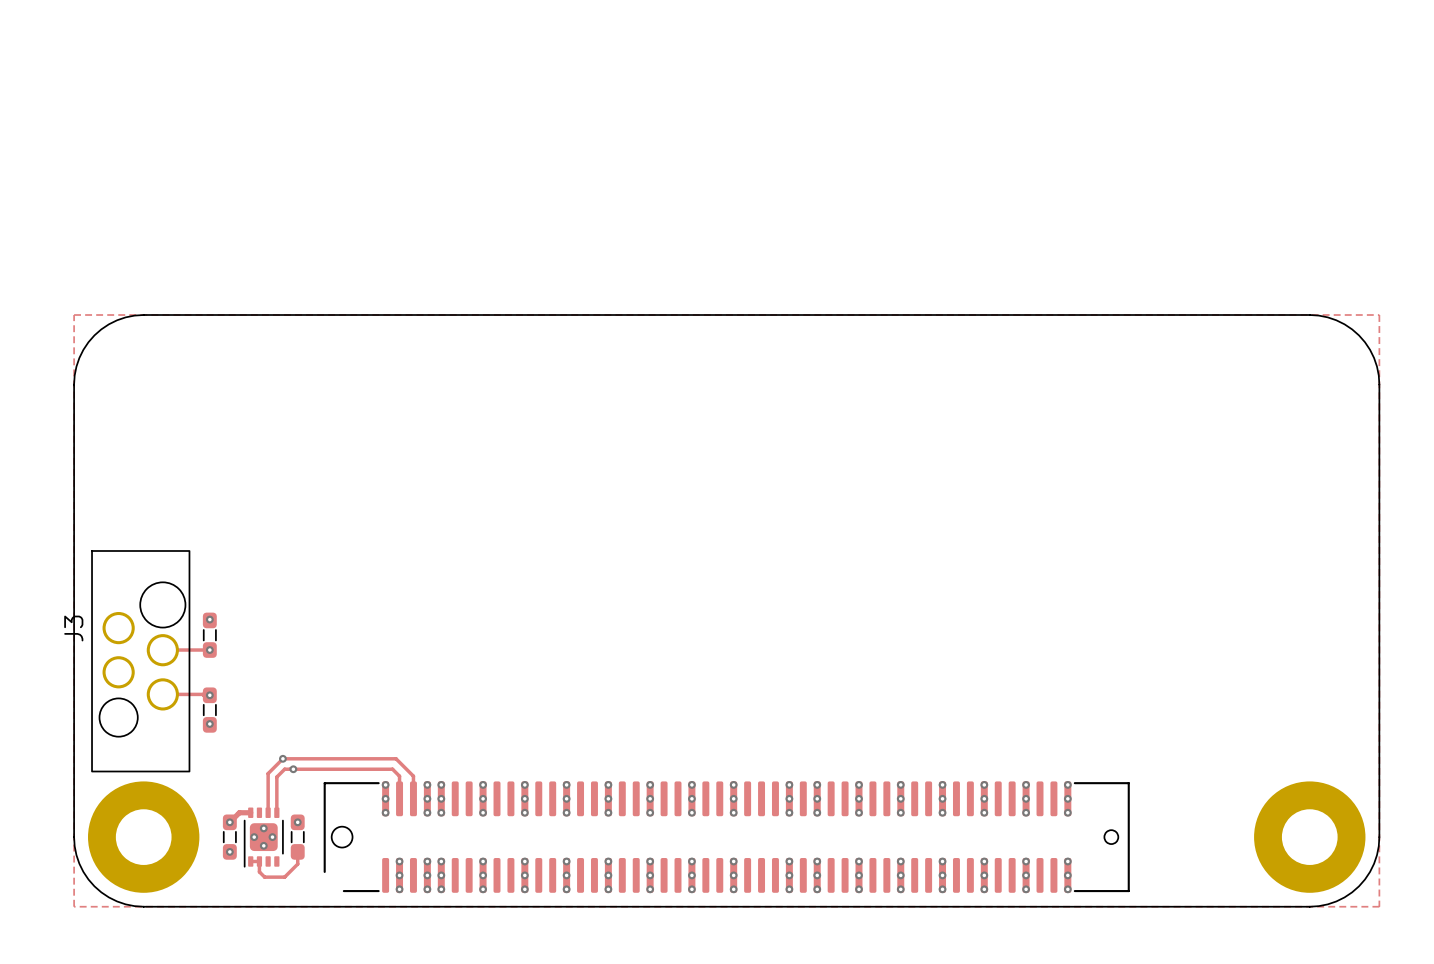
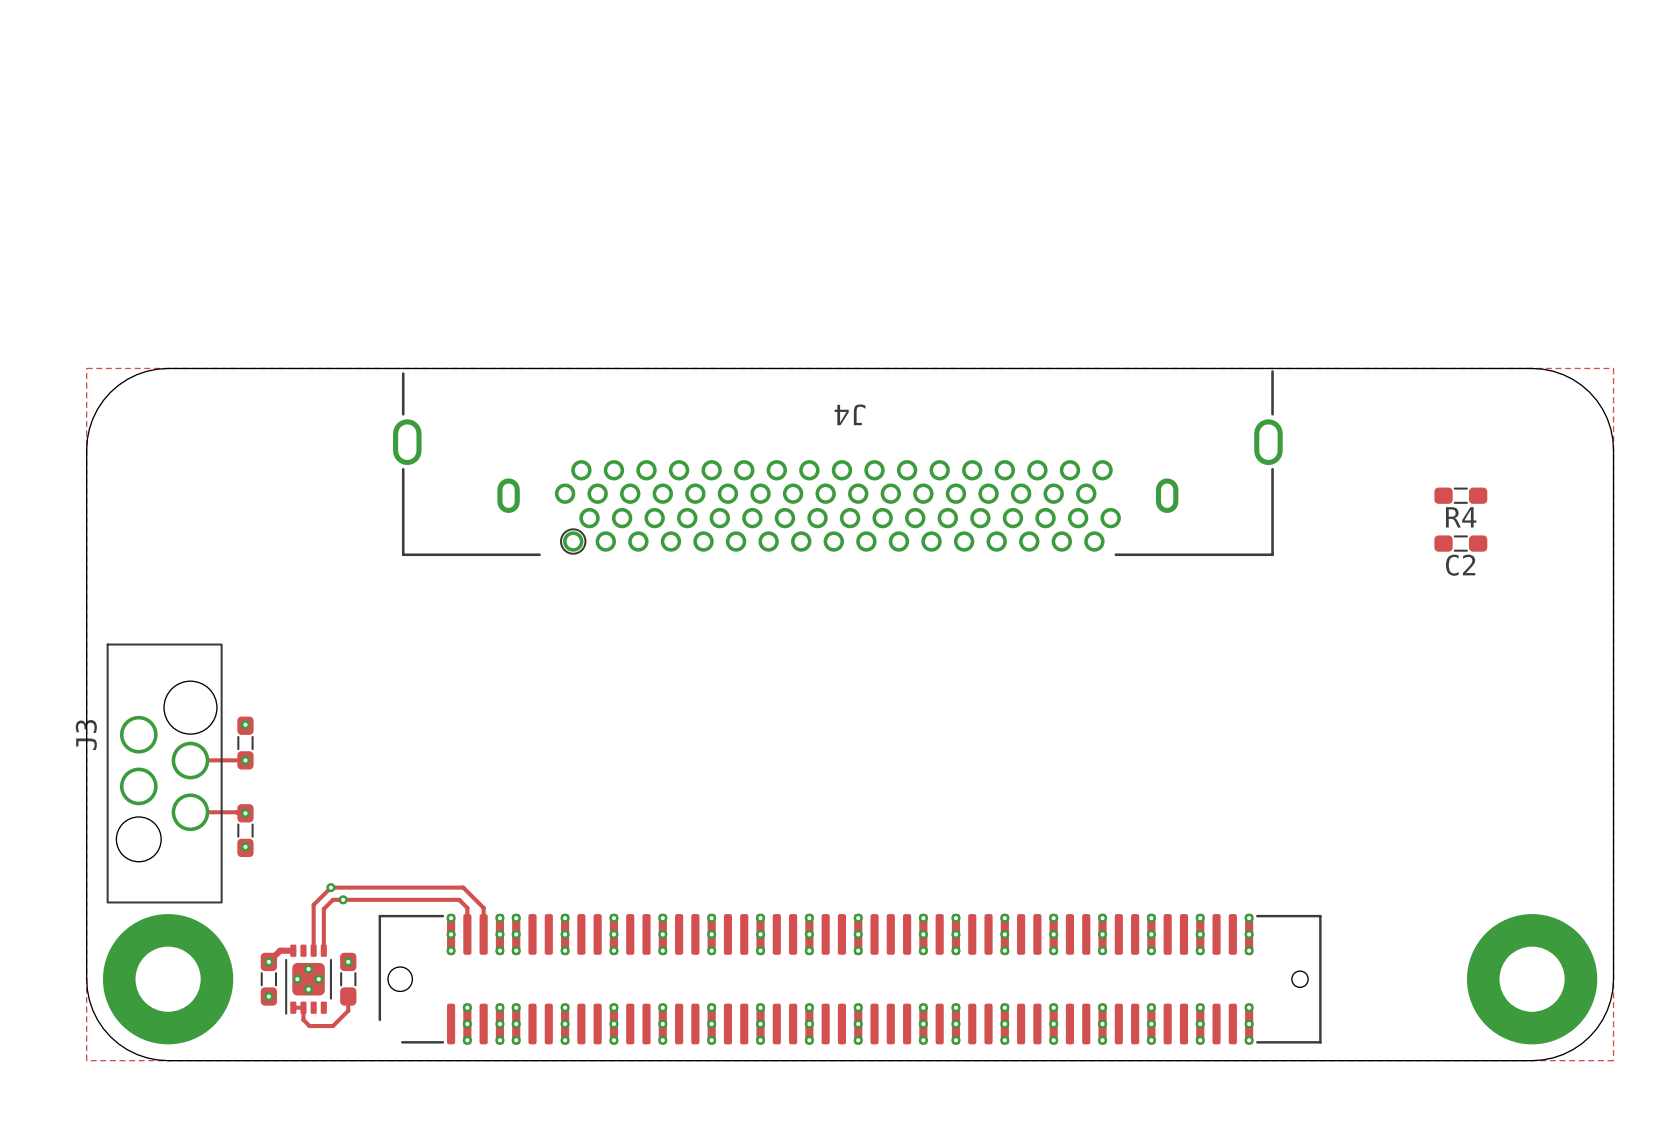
J4: none -> (837, 463)
R4: none -> (1460, 495)
C2: none -> (1460, 543)

